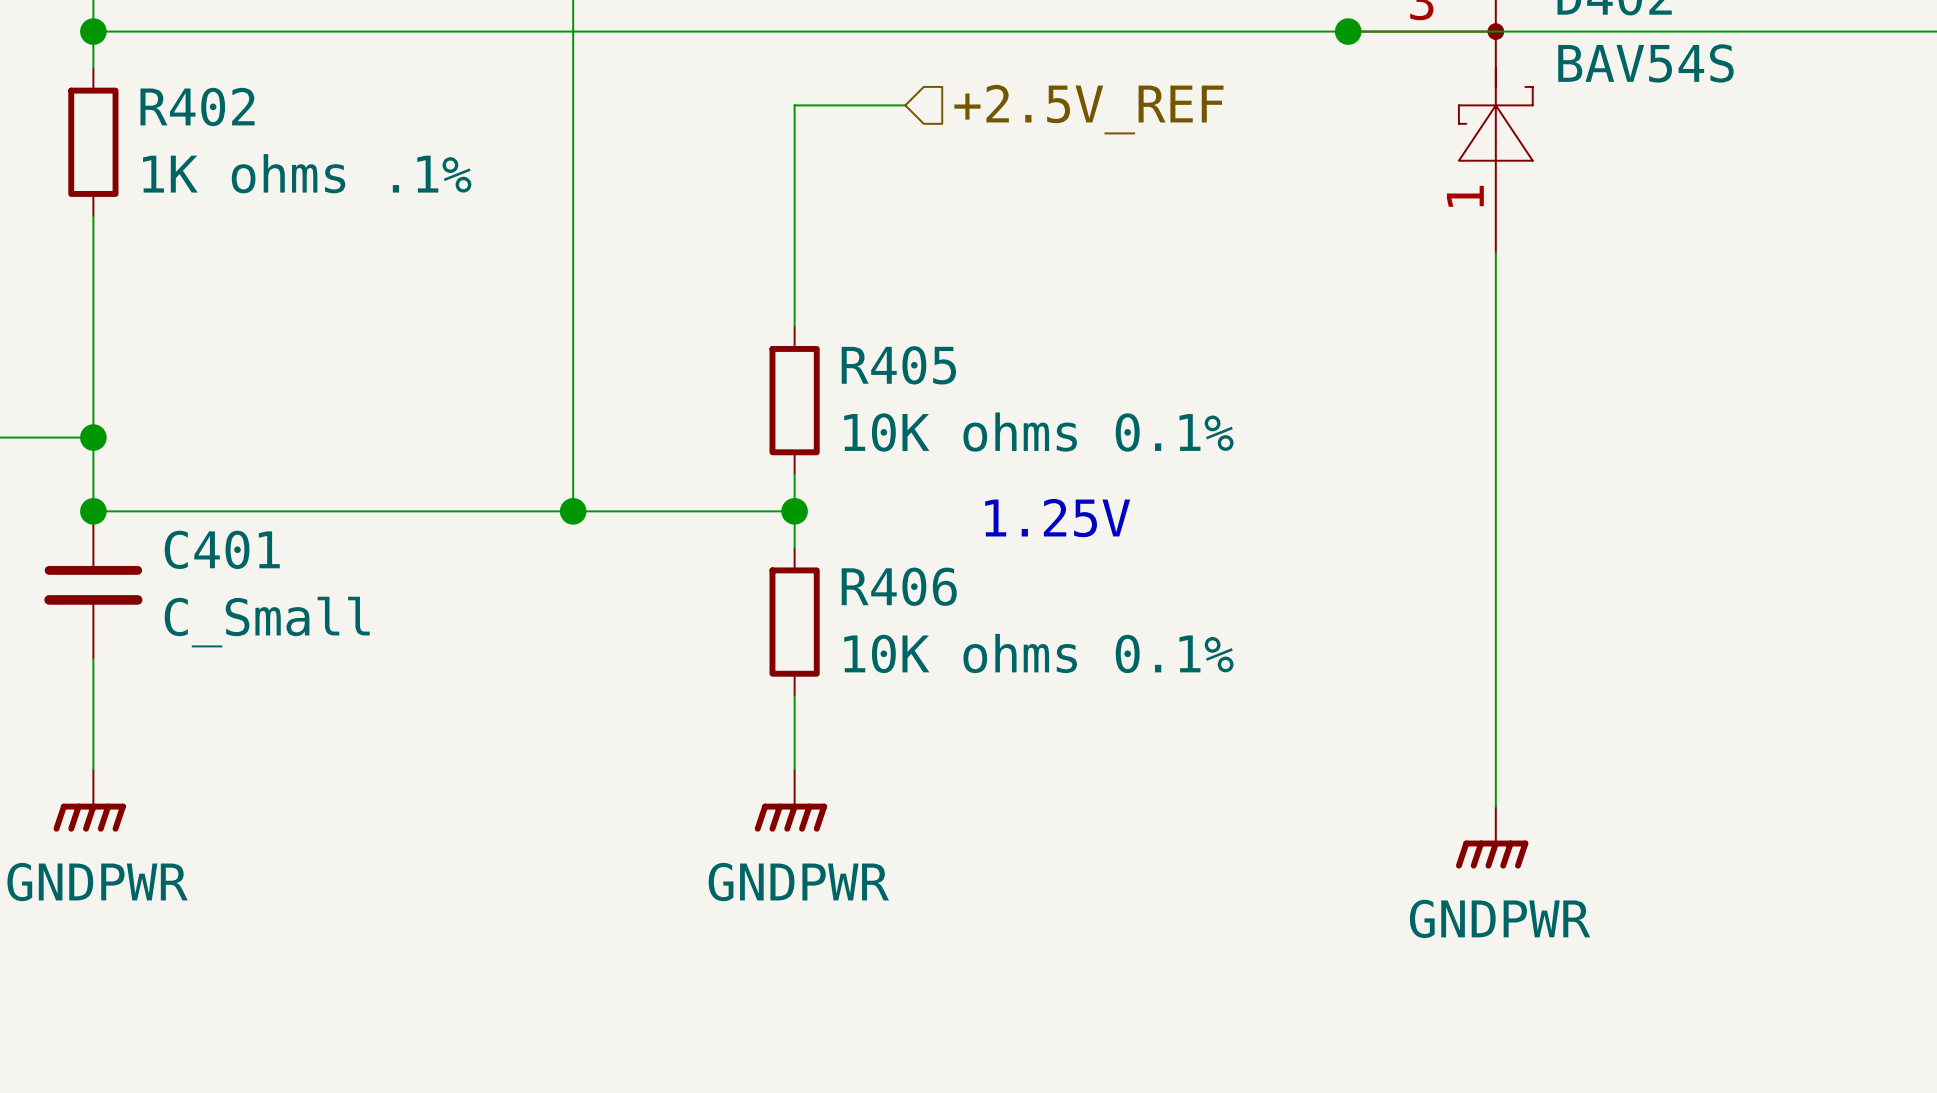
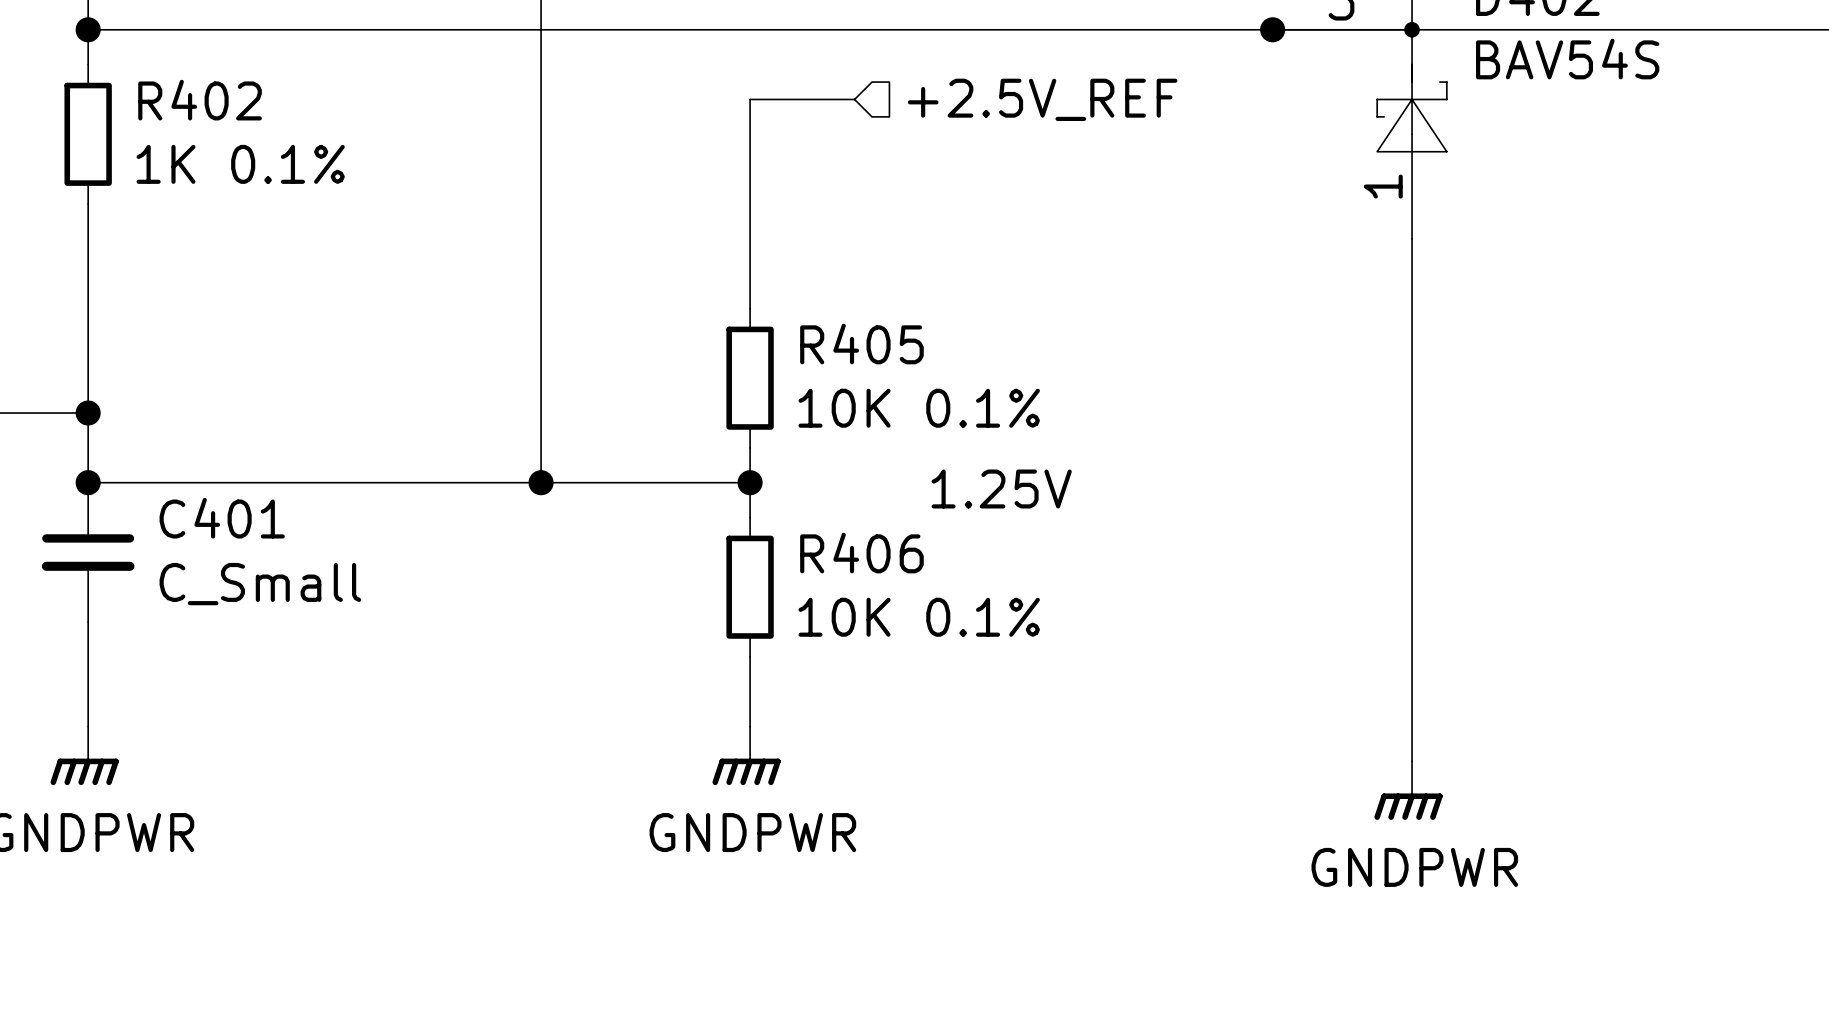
R402 value: 1K ohms .1% (307, 173) -> 1K 0.1% (240, 164)
R405 value: 10K ohms 0.1% (1038, 432) -> 10K 0.1% (919, 408)
R406 value: 10K ohms 0.1% (1038, 653) -> 10K 0.1% (919, 617)

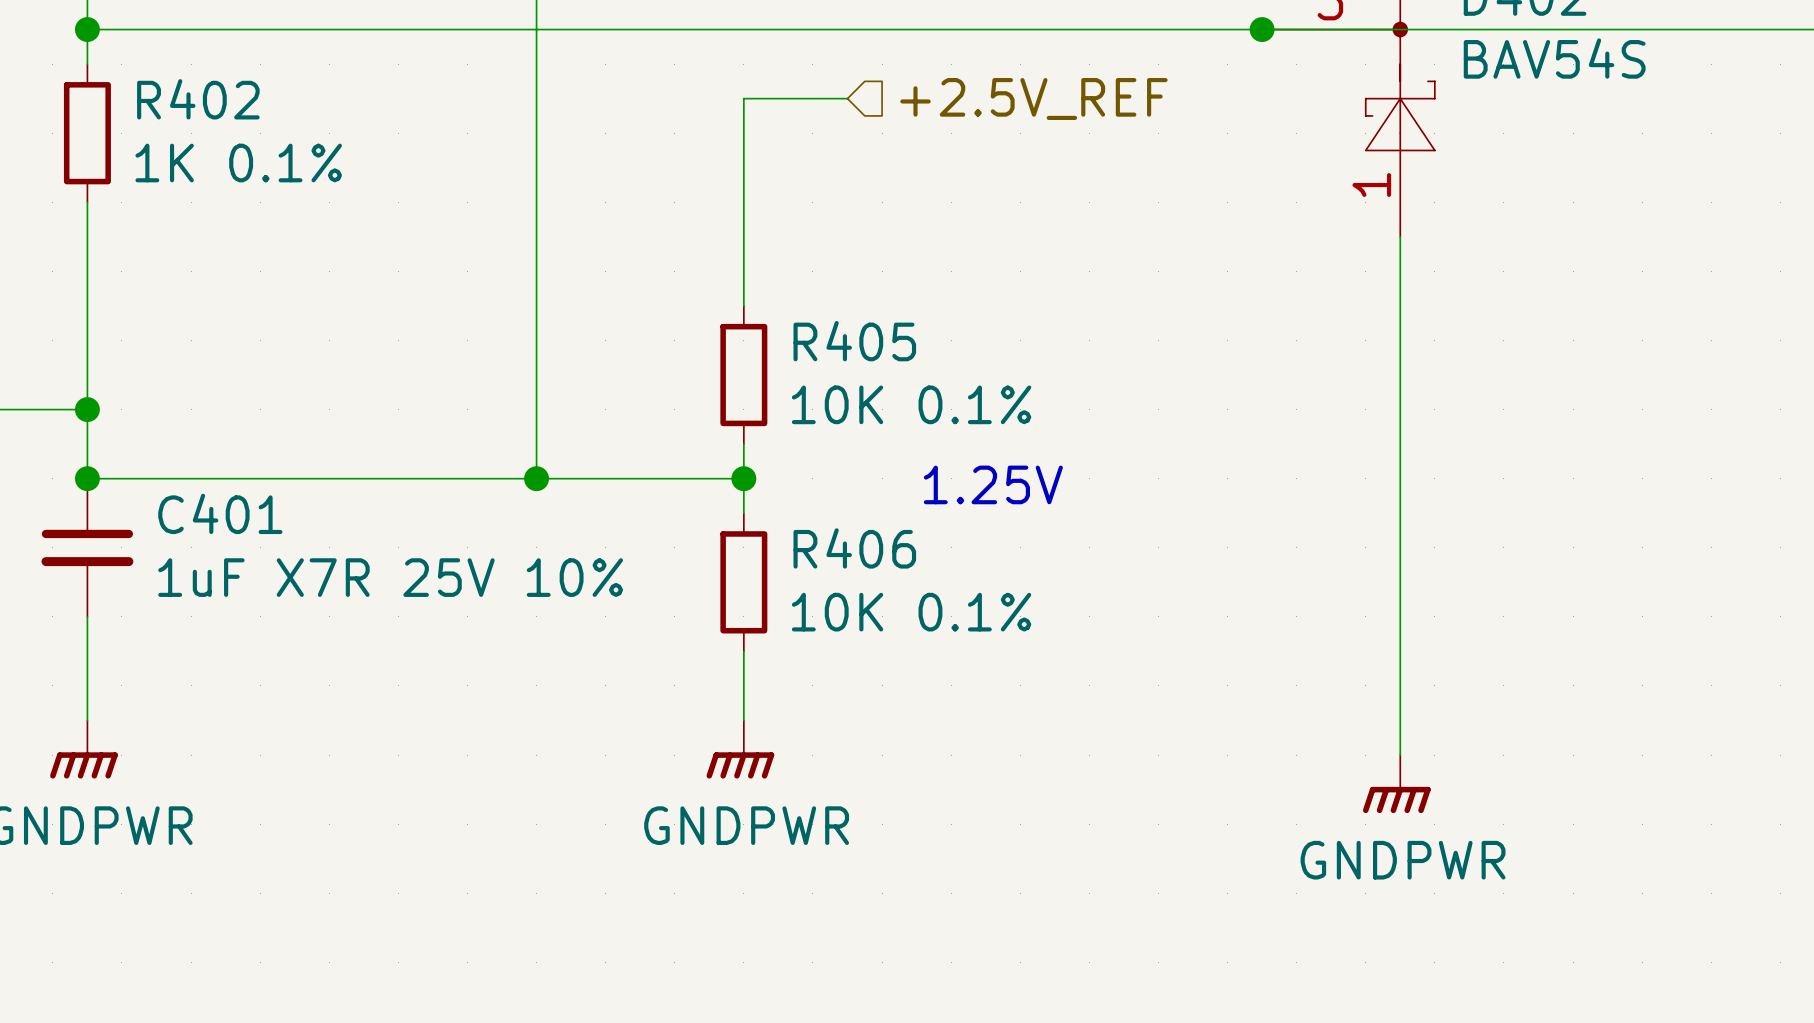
C401 value: C_Small (260, 584) -> 1uF X7R 25V 10% (390, 577)

